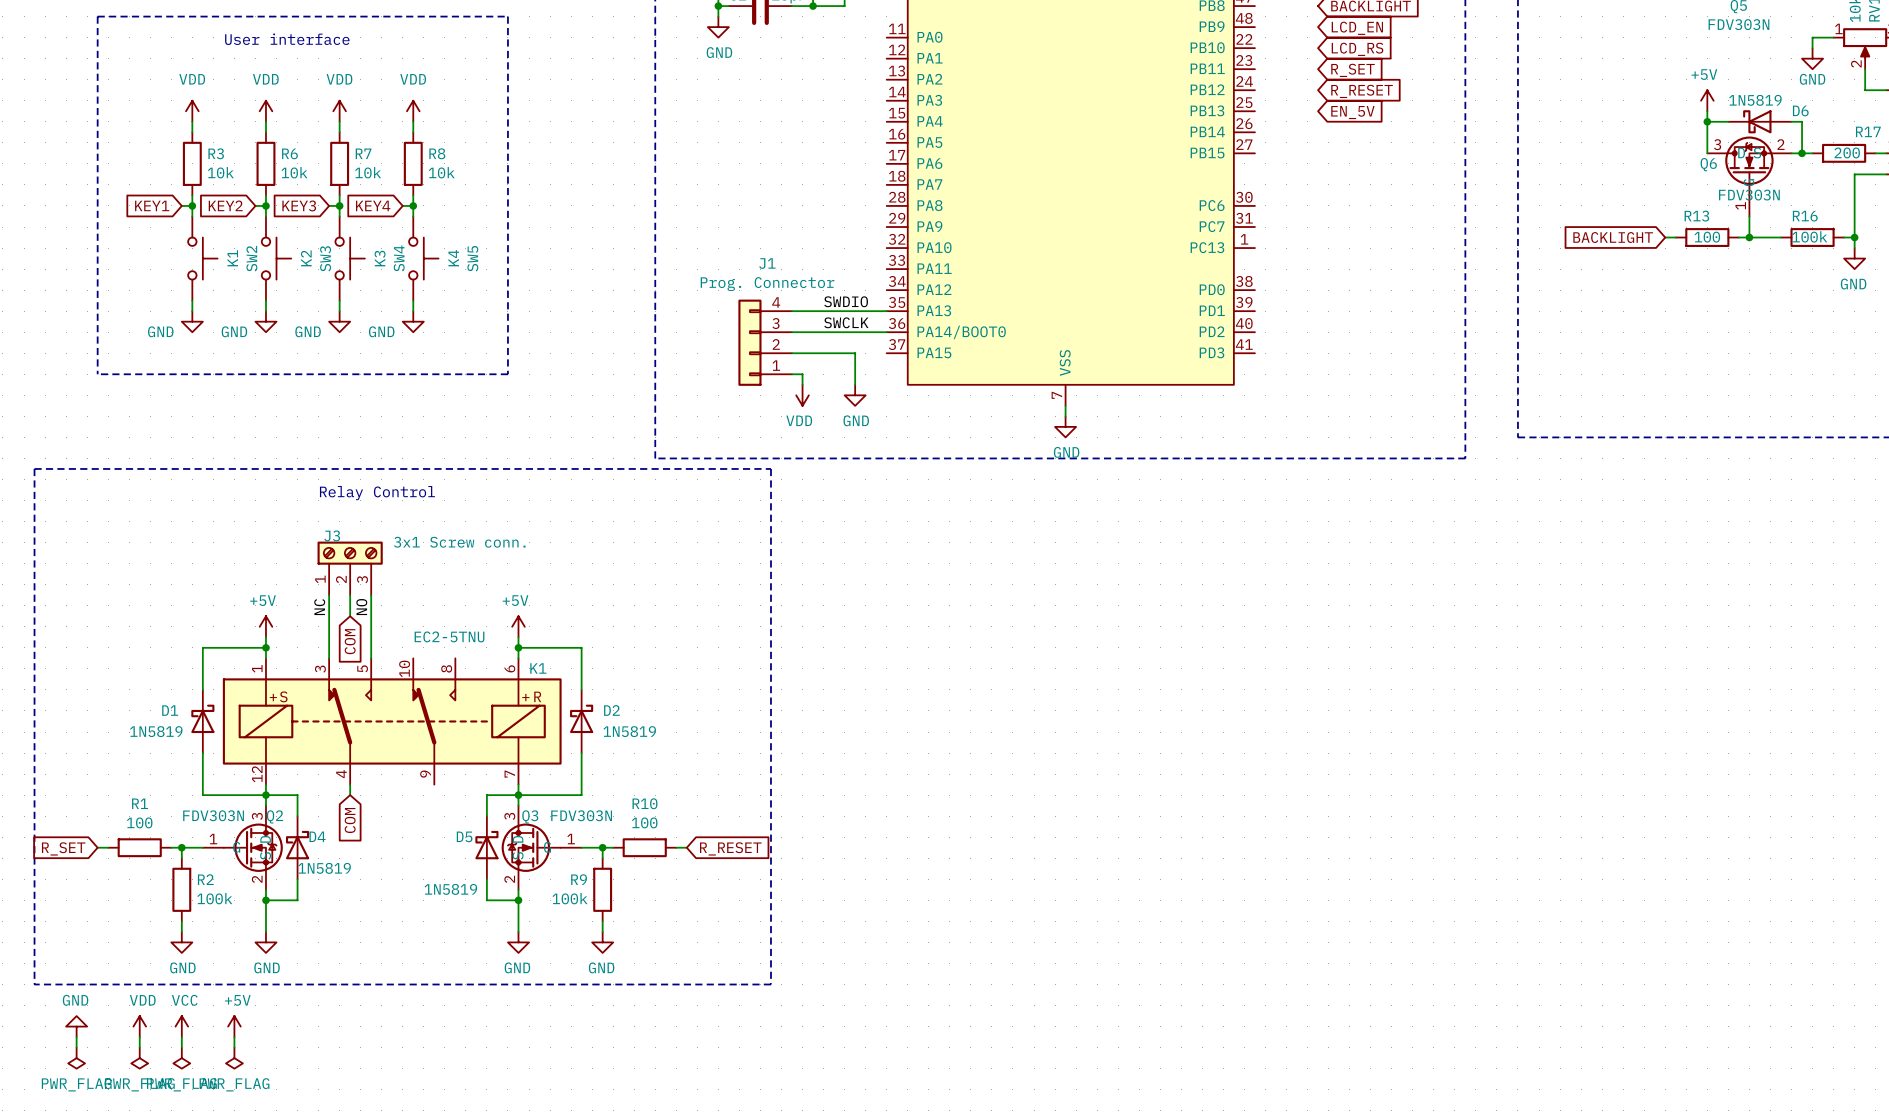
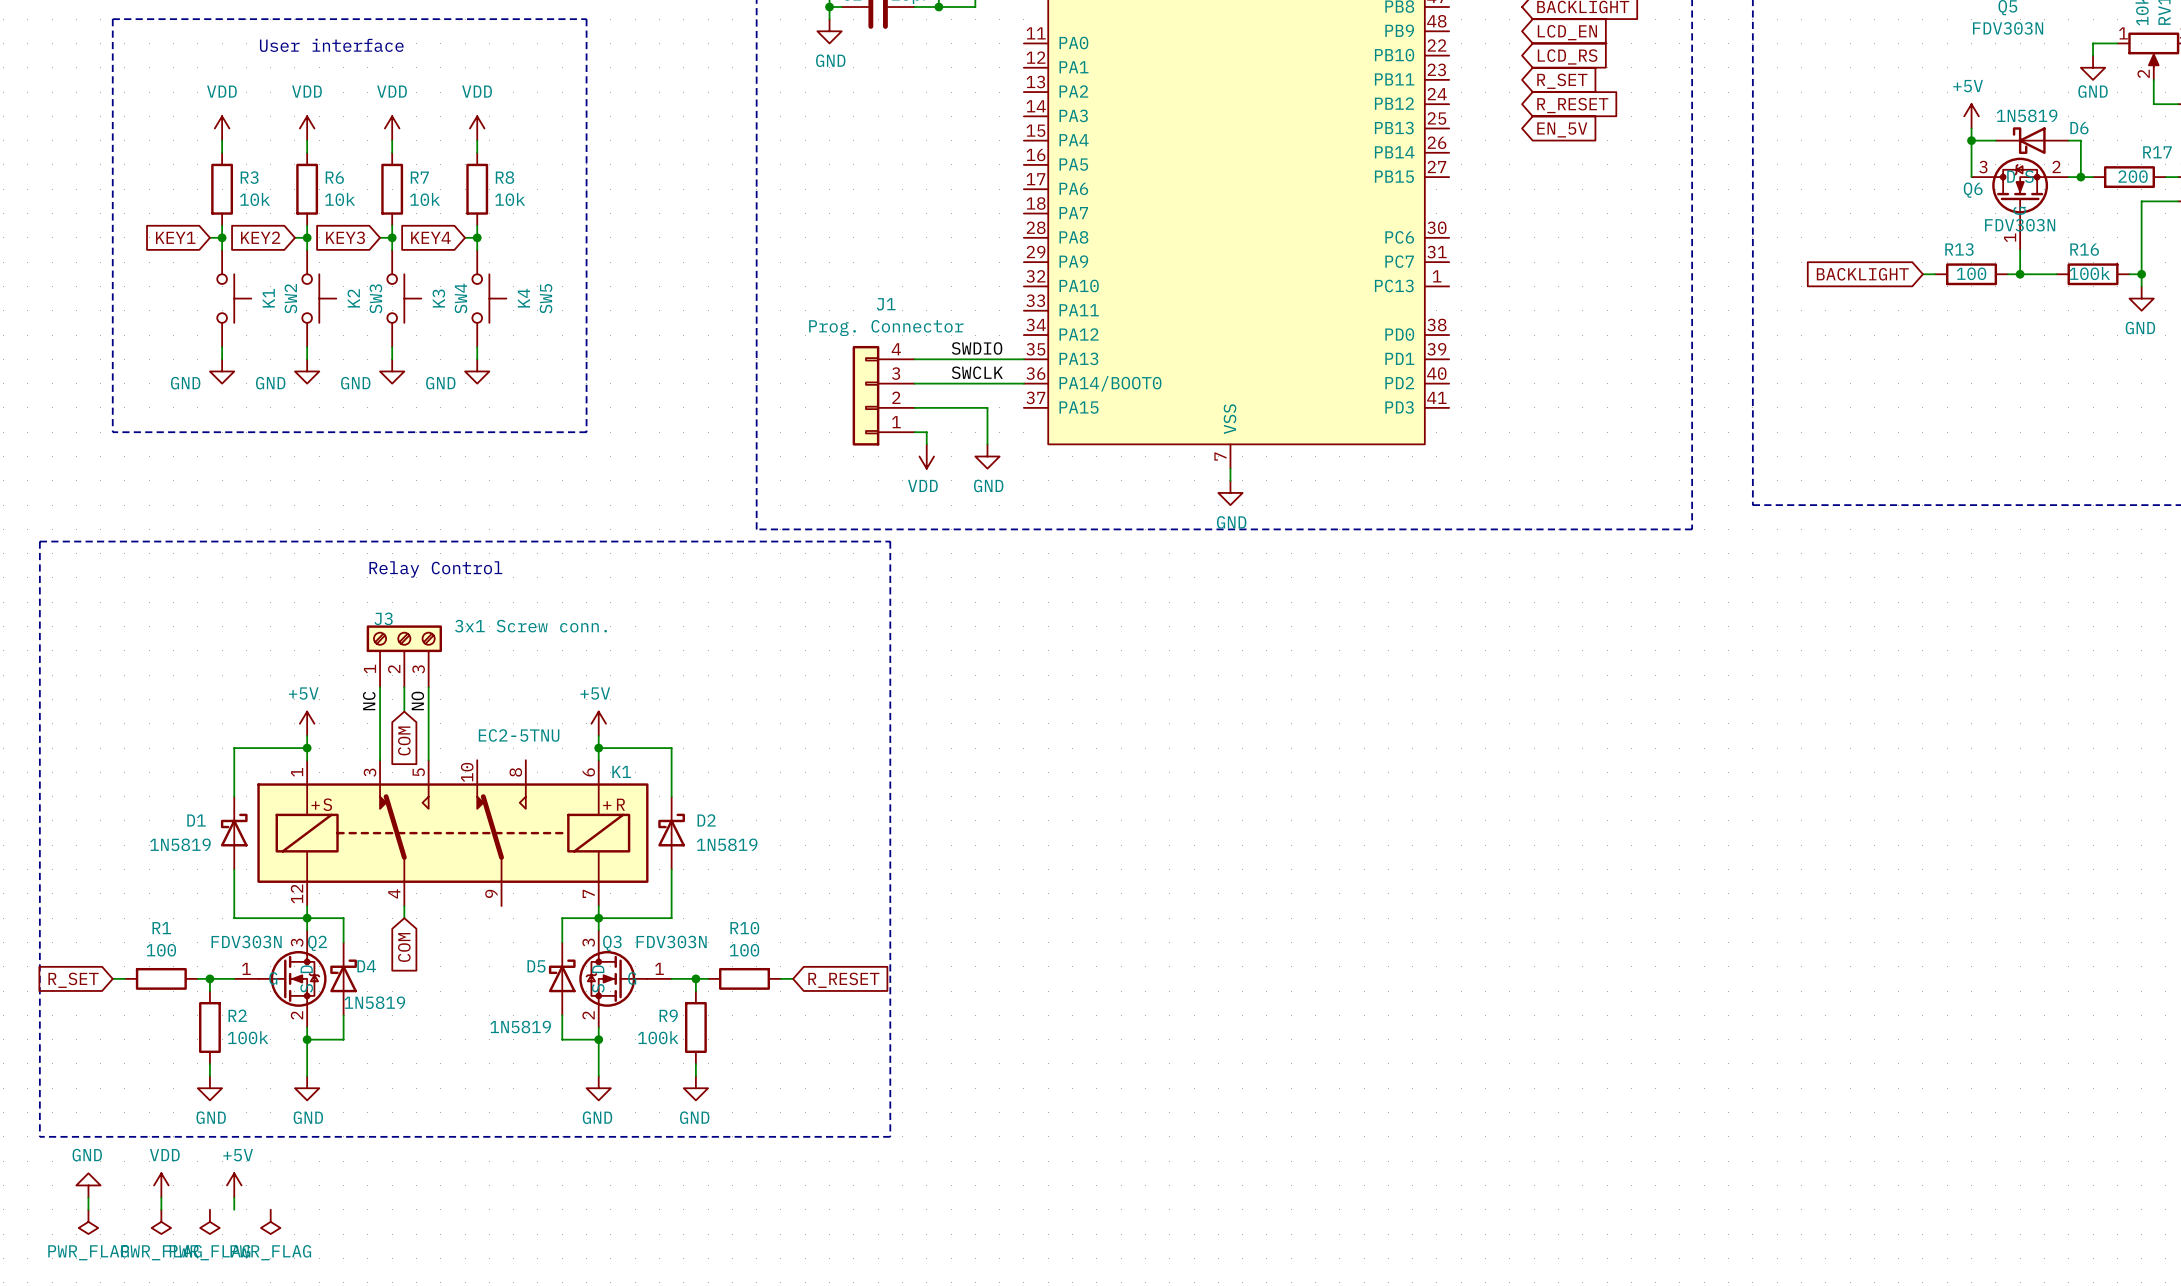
power symbol: VCC (181, 1026) -> none
power symbol position: +5V (234, 1026) -> +5V (234, 1185)
wire: (181, 1037) (181, 1047) -> (234, 1197) (234, 1209)
wire: (234, 1037) (234, 1047) -> none

